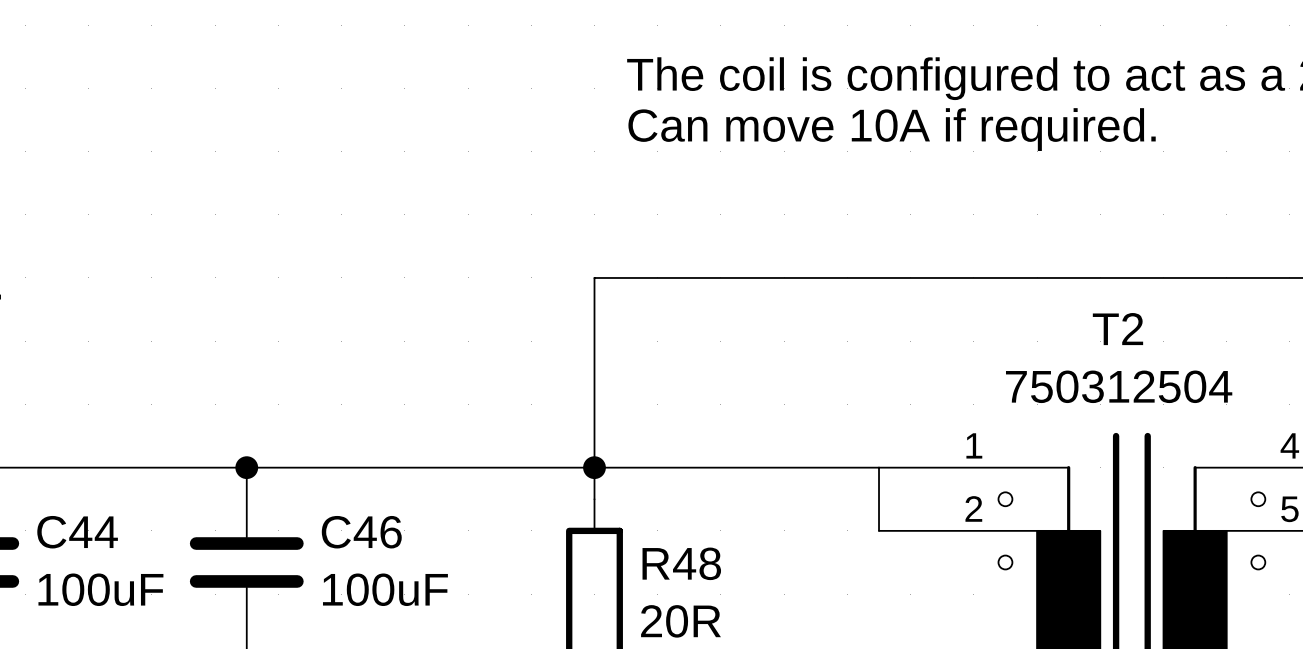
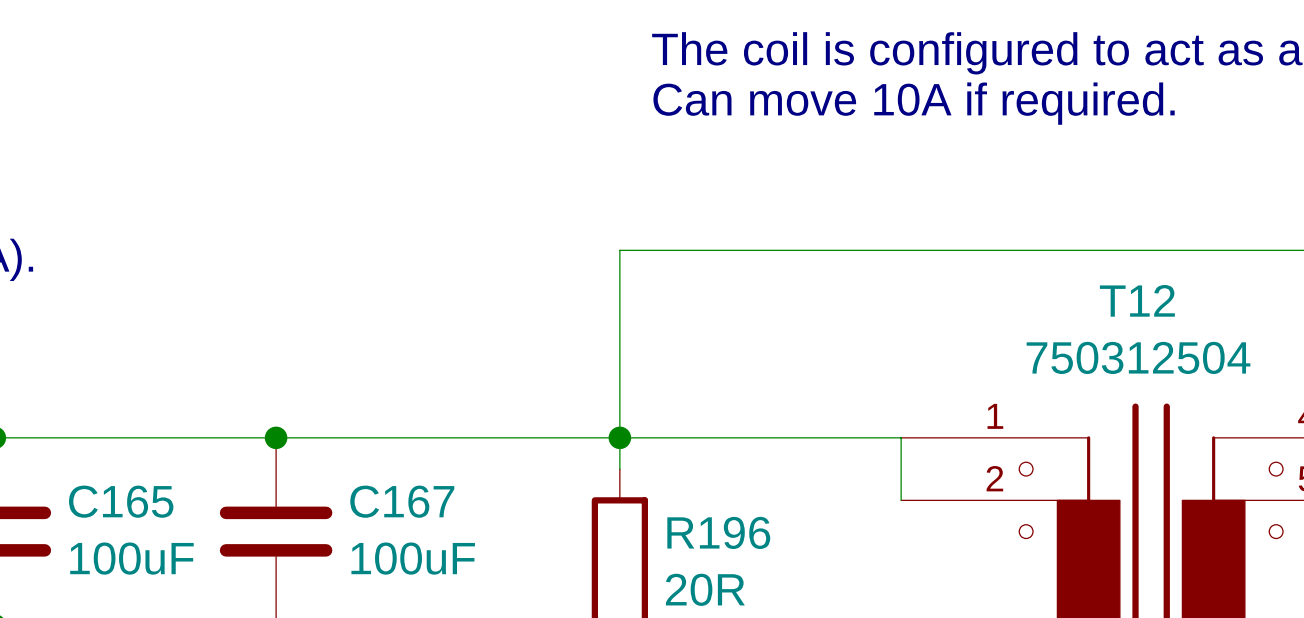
T2 name: T2 (1117, 329) -> T12 (1137, 300)
C44 name: C44 (77, 532) -> C165 (121, 501)
C46 name: C46 (361, 532) -> C167 (402, 501)
R48 name: R48 (681, 563) -> R196 (718, 532)

